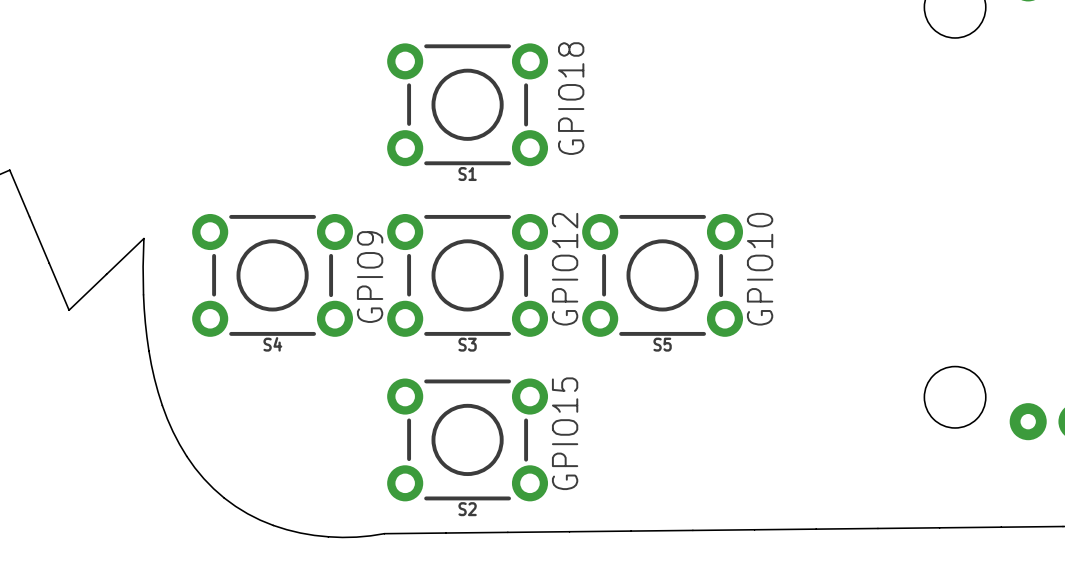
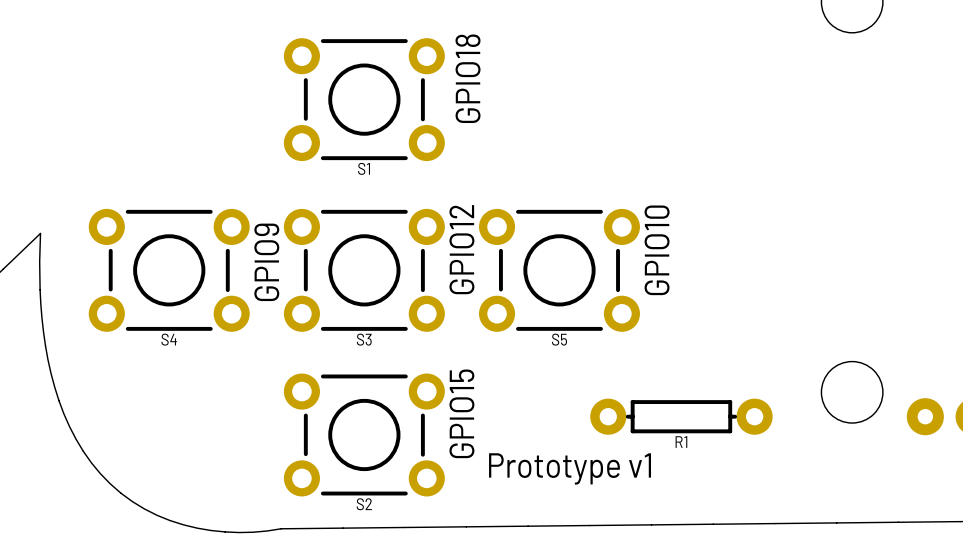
R1: none -> (681, 416)
text: none -> Prototype v1 (570, 468)

